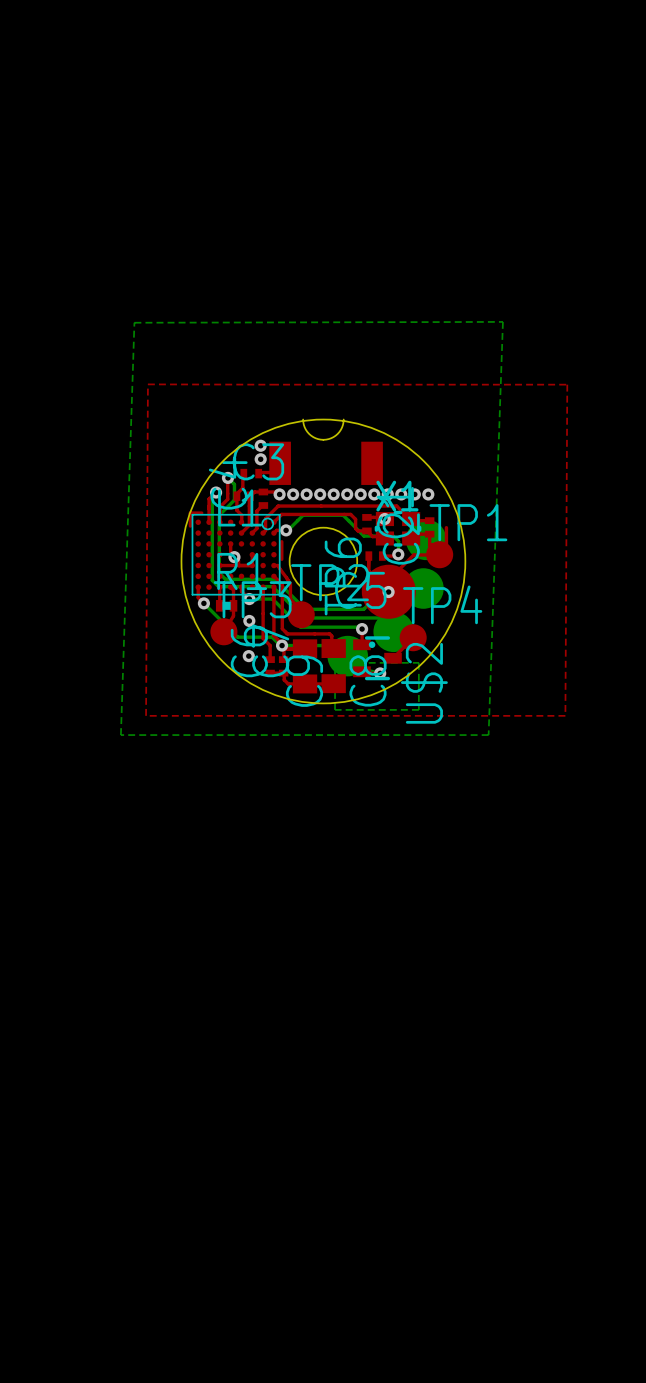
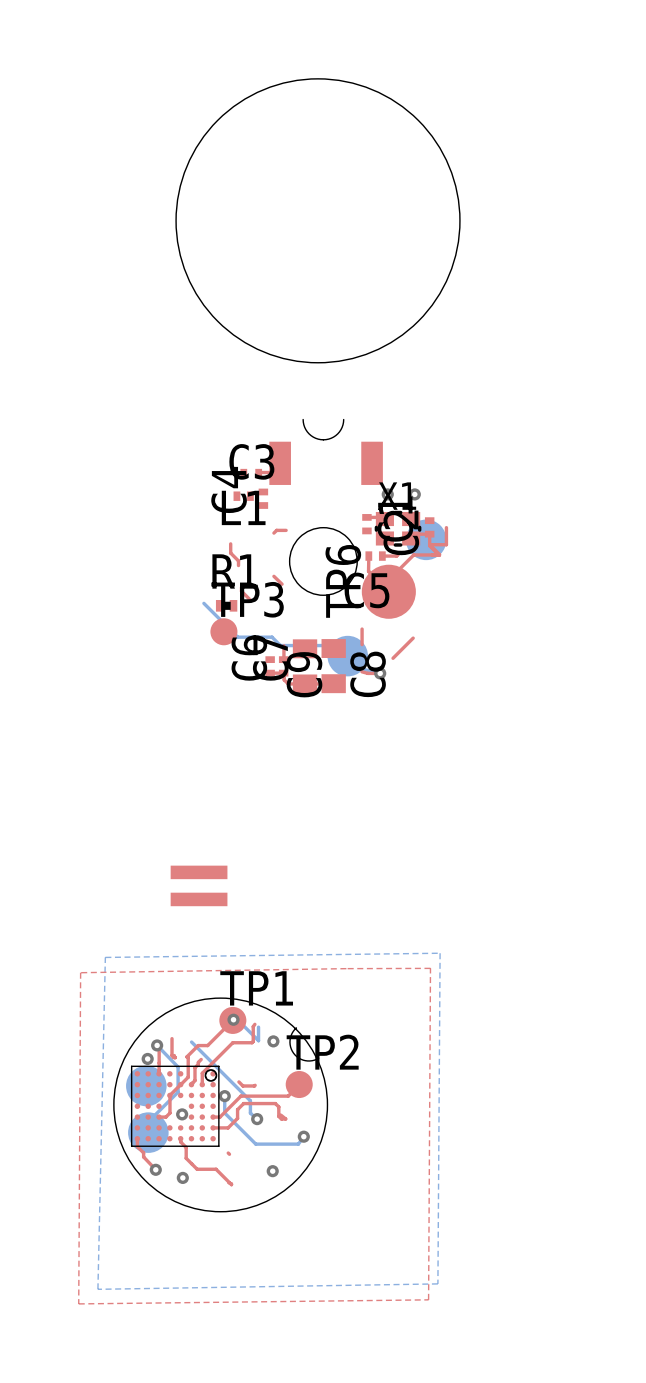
bottom zone outline: (502, 321) (488, 735) (120, 735) (134, 322) (502, 321) -> none
top zone outline: (147, 384) (146, 715) (565, 715) (567, 384) (147, 384) -> none
via: (260, 445) -> none
via: (260, 459) -> none
top track: (243, 473) (242, 487) (236, 493) (236, 510) (241, 515) (241, 522) -> none
top track: (227, 477) (227, 499) (220, 506) (220, 522) -> none
bottom track: (227, 477) (234, 484) (234, 500) (219, 515) (219, 573) (225, 579) (275, 579) (305, 609) (363, 609) (368, 604) (407, 604) (423, 588) -> none
via: (227, 477) -> none
top track: (216, 492) (209, 499) (209, 522) -> none
bottom track: (216, 492) (212, 495) (212, 580) (218, 586) (272, 586) (303, 617) (379, 617) (393, 631) -> none
via: (216, 492) -> none
top track: (279, 494) (277, 491) (254, 491) (249, 495) (249, 525) (241, 533) -> none
via: (279, 494) -> none
via: (293, 494) -> none
via: (306, 494) -> none
via: (320, 494) -> none
via: (333, 494) -> none
via: (347, 494) -> none
via: (360, 494) -> none
via: (374, 494) -> none
via: (401, 494) -> none
via: (428, 494) -> none
top track: (263, 505) (256, 511) (256, 528) (252, 533) -> none
top track: (190, 513) (190, 526) -> none
top track: (192, 513) (201, 513) -> none
via: (384, 519) -> none
top track: (429, 520) (414, 520) (408, 517) (396, 506) (278, 506) (265, 518) (265, 530) (263, 533) -> none
top track: (273, 522) (281, 514) (350, 514) (355, 519) (355, 528) (358, 530) (366, 530) (372, 536) (383, 536) (384, 538) -> none
drawing position: (267, 523) -> (210, 1075)
bottom track: (286, 530) (303, 515) (343, 515) (363, 536) (393, 536) (398, 541) (398, 554) -> none
via: (286, 530) -> none
top track: (281, 541) (281, 559) -> none
part position: (236, 554) -> (175, 1106)
top track: (252, 554) (252, 565) (219, 565) -> none
via: (398, 554) -> none
TP1 position: (439, 554) -> (232, 1020)
via: (234, 557) -> none
round board edge position: (323, 561) -> (318, 220)
top track: (273, 565) (277, 565) (290, 583) (290, 599) (301, 610) (301, 614) -> none
top track: (282, 584) (282, 628) (287, 633) (329, 633) (331, 636) (331, 646) (333, 648) -> none
top track: (198, 587) (198, 597) (203, 603) -> none
top track: (219, 587) (219, 605) -> none
top track: (230, 587) (233, 590) (233, 615) (223, 631) -> none
top track: (263, 587) (263, 638) (270, 645) (270, 659) -> none
top track: (273, 587) (273, 635) (286, 648) (305, 648) -> none
part: (423, 588) -> none
via: (388, 592) -> none
bottom track: (249, 599) (272, 599) (300, 627) (360, 627) (362, 629) -> none
via: (249, 599) -> none
via: (203, 603) -> none
TP2 position: (301, 614) -> (299, 1084)
via: (249, 620) -> none
via: (362, 629) -> none
part: (393, 631) -> none
TP4: (413, 637) -> none
via: (282, 645) -> none
via: (248, 656) -> none
U$2: (377, 658) -> none
bottom zone outline: (335, 662) (335, 709) (418, 709) (418, 662) (335, 662) -> none
part: none -> (199, 885)
bottom zone outline: none -> (440, 953) (437, 1283) (97, 1289) (105, 957) (440, 953)
top zone outline: none -> (430, 968) (428, 1299) (78, 1303) (80, 972) (430, 968)
round board edge: none -> [113, 997, 328, 1212]
top track: none -> (236, 1017) (207, 1045) (198, 1045) (186, 1056) (188, 1077) (169, 1095)
bottom track: none -> (233, 1019) (237, 1019) (258, 1040) (258, 1027)
via: none -> (233, 1019)
top track: none -> (254, 1024) (253, 1041) (232, 1042) (202, 1073) (202, 1084)
board edge: none -> (296, 1027) (290, 1040) (293, 1053) (305, 1060) (318, 1058)
top track: none -> (172, 1038) (172, 1055) (174, 1056)
via: none -> (273, 1041)
bottom track: none -> (191, 1042) (250, 1100) (250, 1113) (256, 1119)
top track: none -> (157, 1045) (159, 1045) (159, 1073)
bottom track: none -> (157, 1045) (178, 1067) (178, 1092) (153, 1117) (153, 1127) (148, 1132)
via: none -> (157, 1045)
via: none -> (147, 1058)
top track: none -> (201, 1059) (194, 1067) (194, 1080) (191, 1084)
top track: none -> (238, 1081) (242, 1085) (255, 1085)
top track: none -> (299, 1084) (288, 1096) (240, 1096) (220, 1117) (213, 1117)
part: none -> (146, 1085)
top track: none -> (169, 1095) (169, 1113) (165, 1117) (159, 1117)
bottom track: none -> (224, 1096) (224, 1113) (255, 1144) (298, 1144) (303, 1136)
via: none -> (224, 1096)
via: none -> (182, 1114)
top track: none -> (280, 1115) (285, 1118) (281, 1118)
via: none -> (257, 1119)
top track: none -> (281, 1119) (278, 1116) (278, 1106) (275, 1103) (243, 1103) (237, 1109) (237, 1118) (228, 1127) (213, 1127)
part: none -> (148, 1132)
via: none -> (303, 1136)
top track: none -> (137, 1138) (137, 1146) (143, 1152) (143, 1156) (155, 1169)
top track: none -> (180, 1138) (180, 1141) (186, 1147) (186, 1158) (197, 1169) (216, 1169) (231, 1184) (228, 1182)
top track: none -> (228, 1153) (229, 1154)
via: none -> (155, 1169)
via: none -> (272, 1171)
via: none -> (182, 1177)

